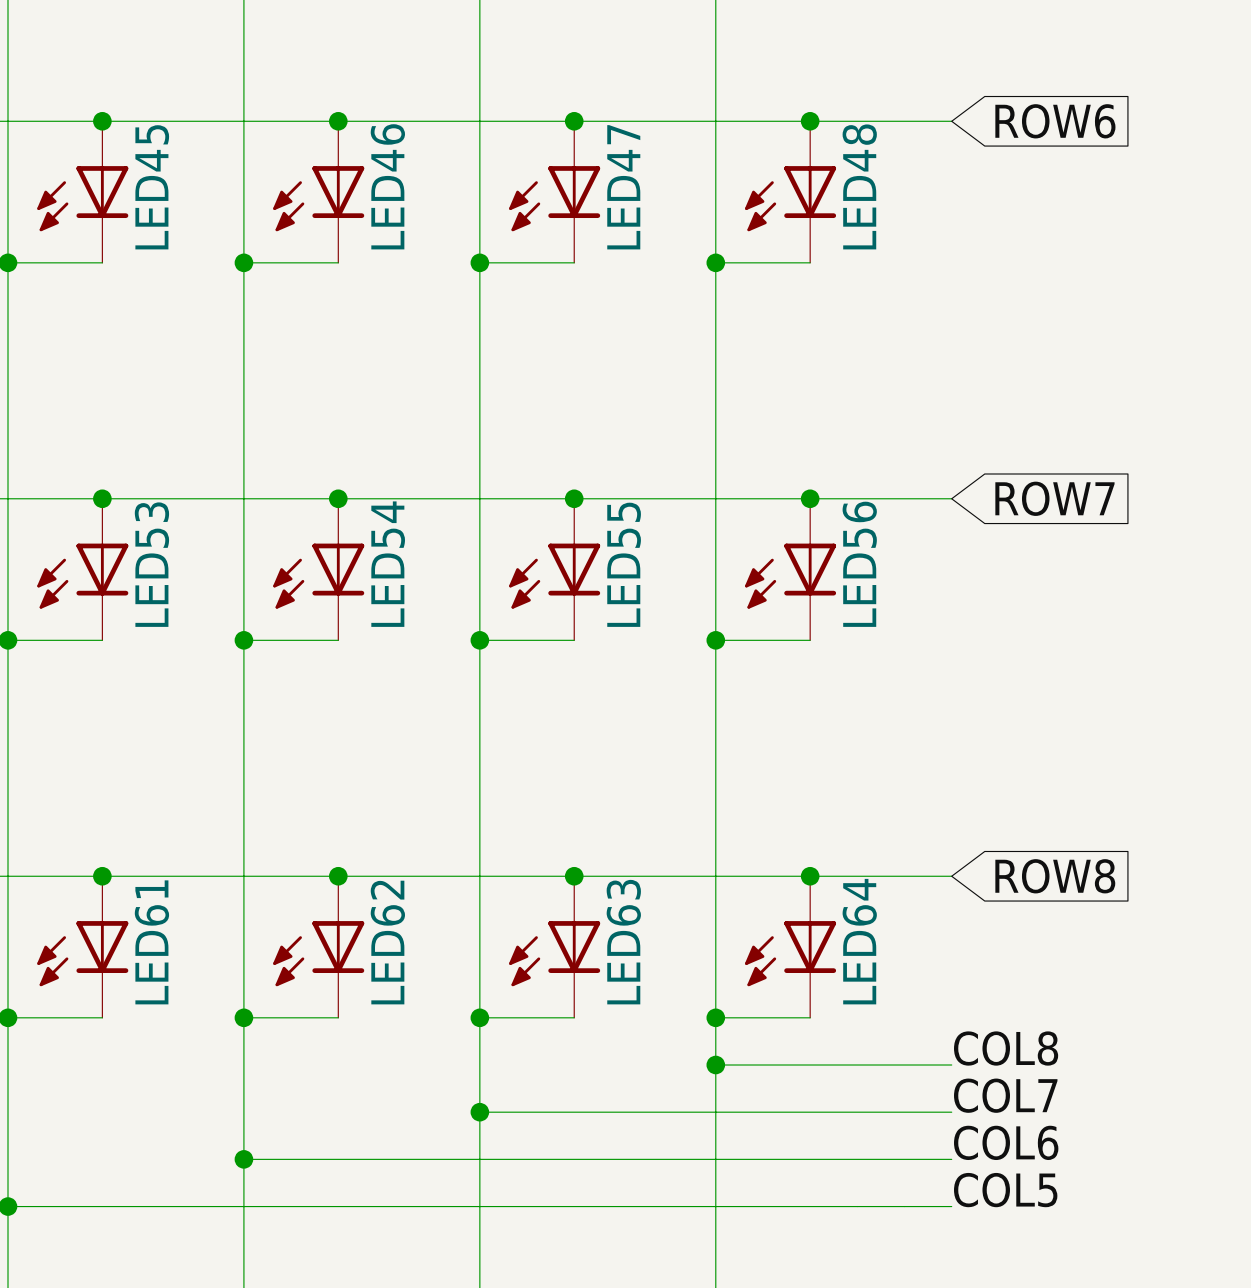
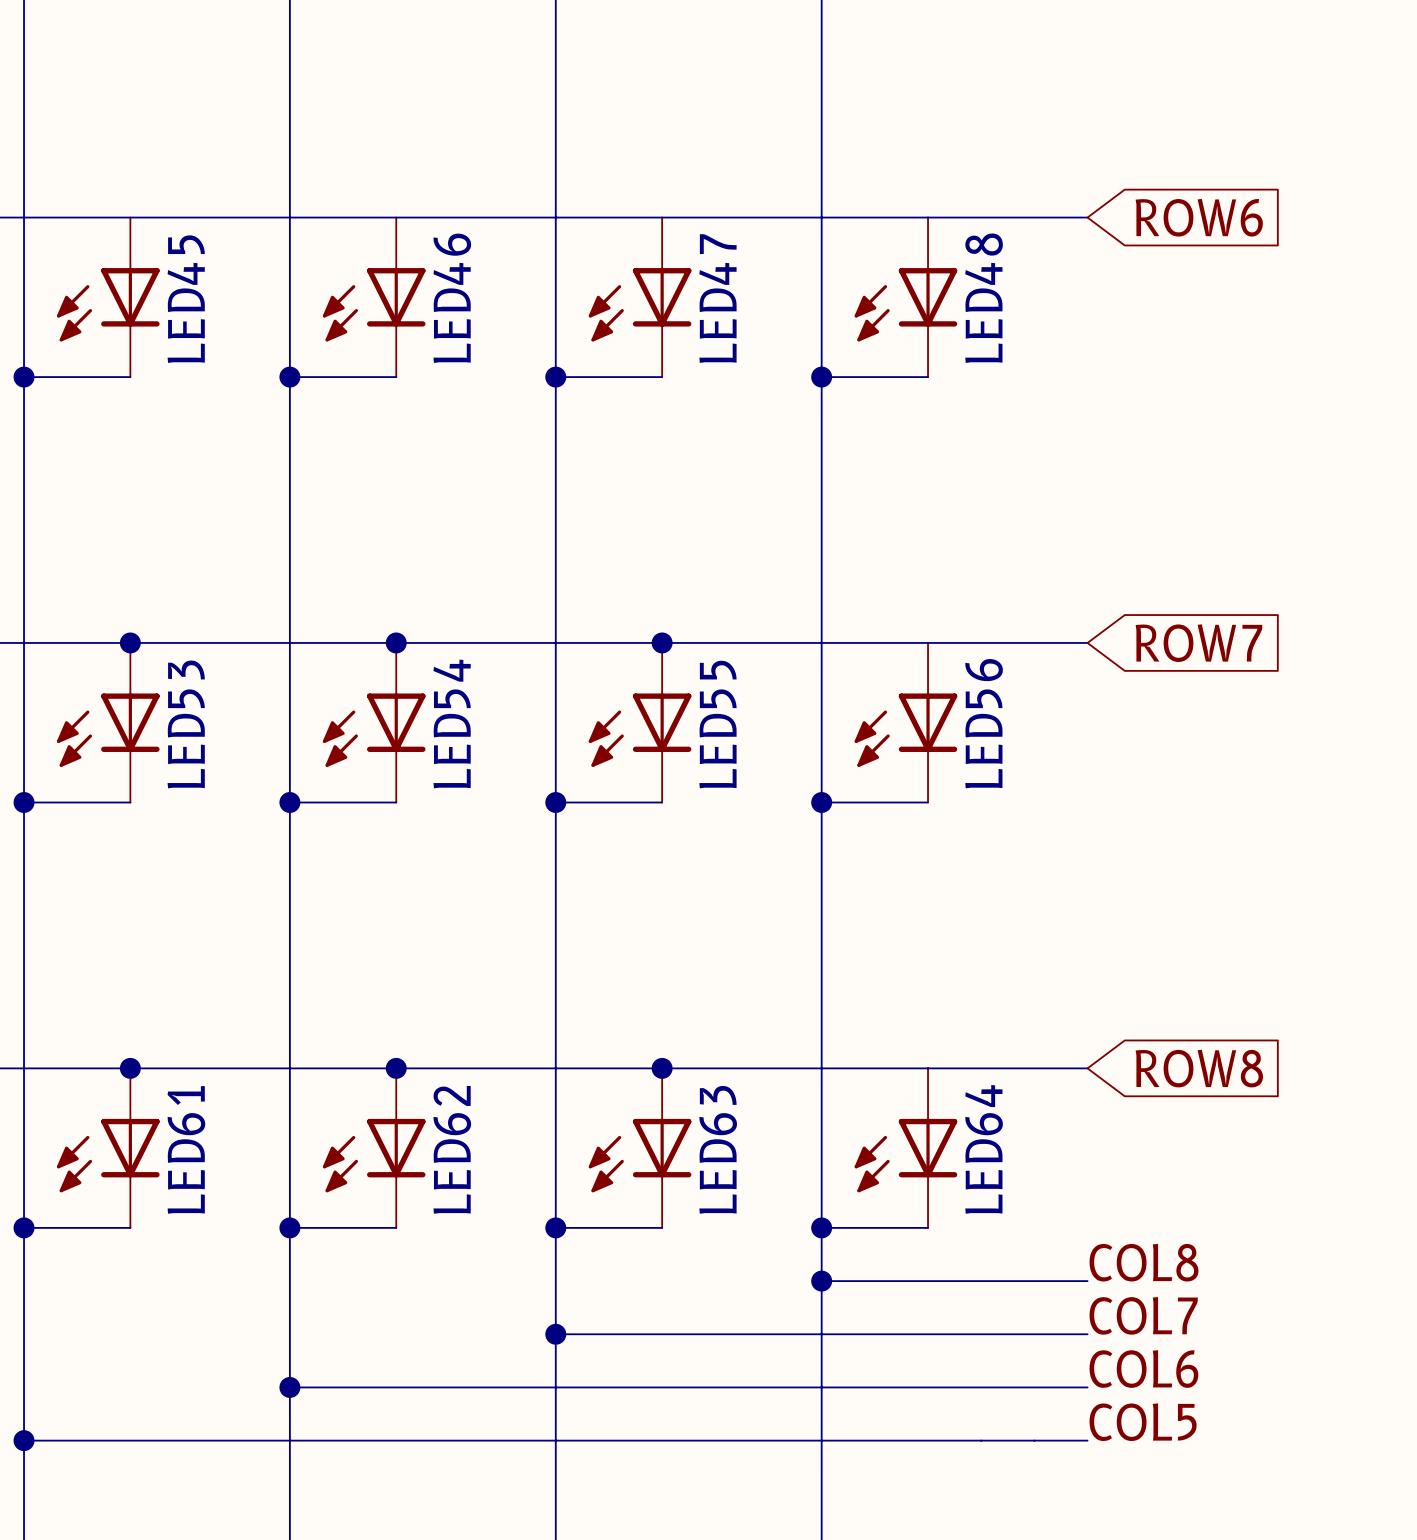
junction: (102, 121) -> none
junction: (338, 121) -> none
junction: (574, 121) -> none
junction: (810, 121) -> none
junction: (810, 498) -> none
junction: (810, 876) -> none

